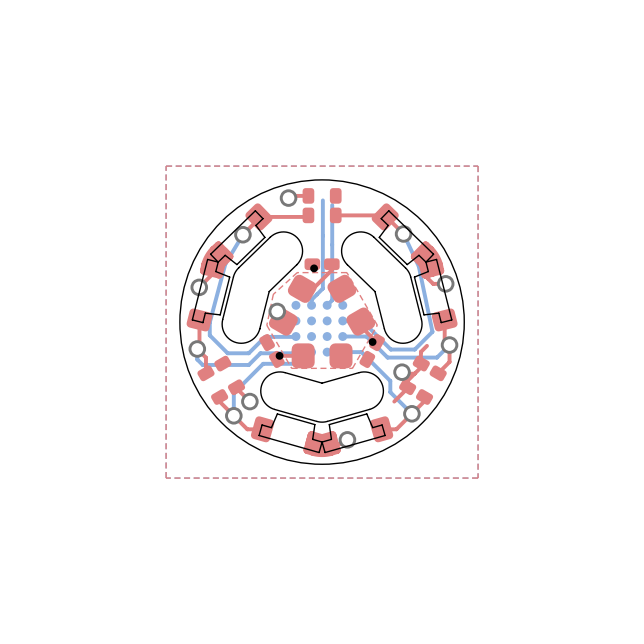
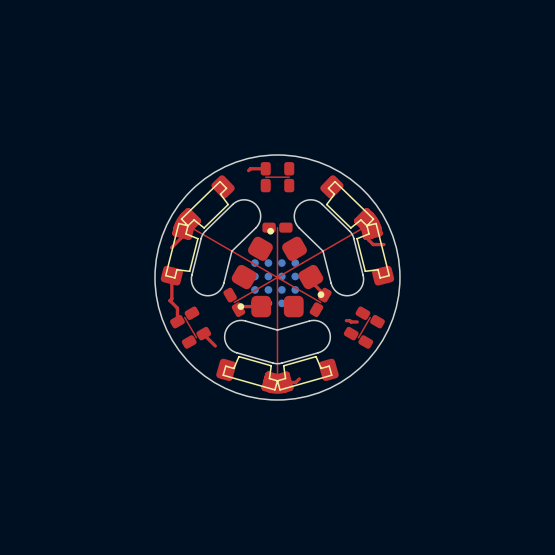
top zone outline: (166, 166) (478, 166) (478, 478) (166, 478) (166, 166) -> none
via: (288, 198) -> none
bottom track: (322, 200) (322, 288) (311, 299) (311, 305) -> none
top track: none -> (265, 177) (289, 177)
bottom track: (332, 205) (332, 300) (327, 305) -> none
top track: (308, 215) (306, 216) (258, 216) (242, 234) -> none
top track: (335, 215) (383, 215) (403, 233) -> none
bottom track: (403, 233) (418, 266) (432, 331) (414, 349) (390, 349) (362, 320) (342, 320) -> none
via: (403, 233) -> none
bottom track: (242, 234) (225, 263) (209, 322) (209, 335) (227, 353) (248, 353) (265, 336) (295, 336) -> none
via: (242, 234) -> none
top track: none -> (277, 227) (277, 373)
top track: (331, 264) (331, 270) (313, 288) (302, 288) -> none
top track: none -> (194, 229) (320, 302)
top track: none -> (360, 229) (234, 302)
top zone outline: (297, 272) (346, 272) (377, 325) (352, 368) (291, 368) (266, 325) (273, 294) (297, 272) -> none
via: (445, 283) -> none
via: (199, 287) -> none
via: (277, 311) -> none
top track: (444, 319) (444, 340) (449, 345) (449, 362) (438, 373) -> none
bottom track: (342, 336) (366, 336) (387, 357) (437, 357) (449, 345) -> none
top track: (426, 345) (420, 351) (420, 367) (407, 380) (407, 388) (394, 401) -> none
via: (449, 345) -> none
bottom track: (197, 348) (197, 359) (202, 364) (248, 364) (260, 353) (295, 352) -> none
via: (197, 348) -> none
bottom track: (311, 352) (311, 356) (303, 363) (263, 363) (233, 393) (233, 415) -> none
bottom track: (342, 352) (361, 352) (390, 380) (390, 392) (411, 413) -> none
top track: none -> (184, 317) (196, 337)
top track: none -> (370, 317) (358, 337)
via: (402, 372) -> none
top track: (219, 396) (219, 401) (247, 429) (262, 429) -> none
top track: (424, 396) (424, 401) (396, 429) (381, 429) -> none
via: (249, 401) -> none
via: (411, 413) -> none
via: (233, 415) -> none
via: (347, 439) -> none

